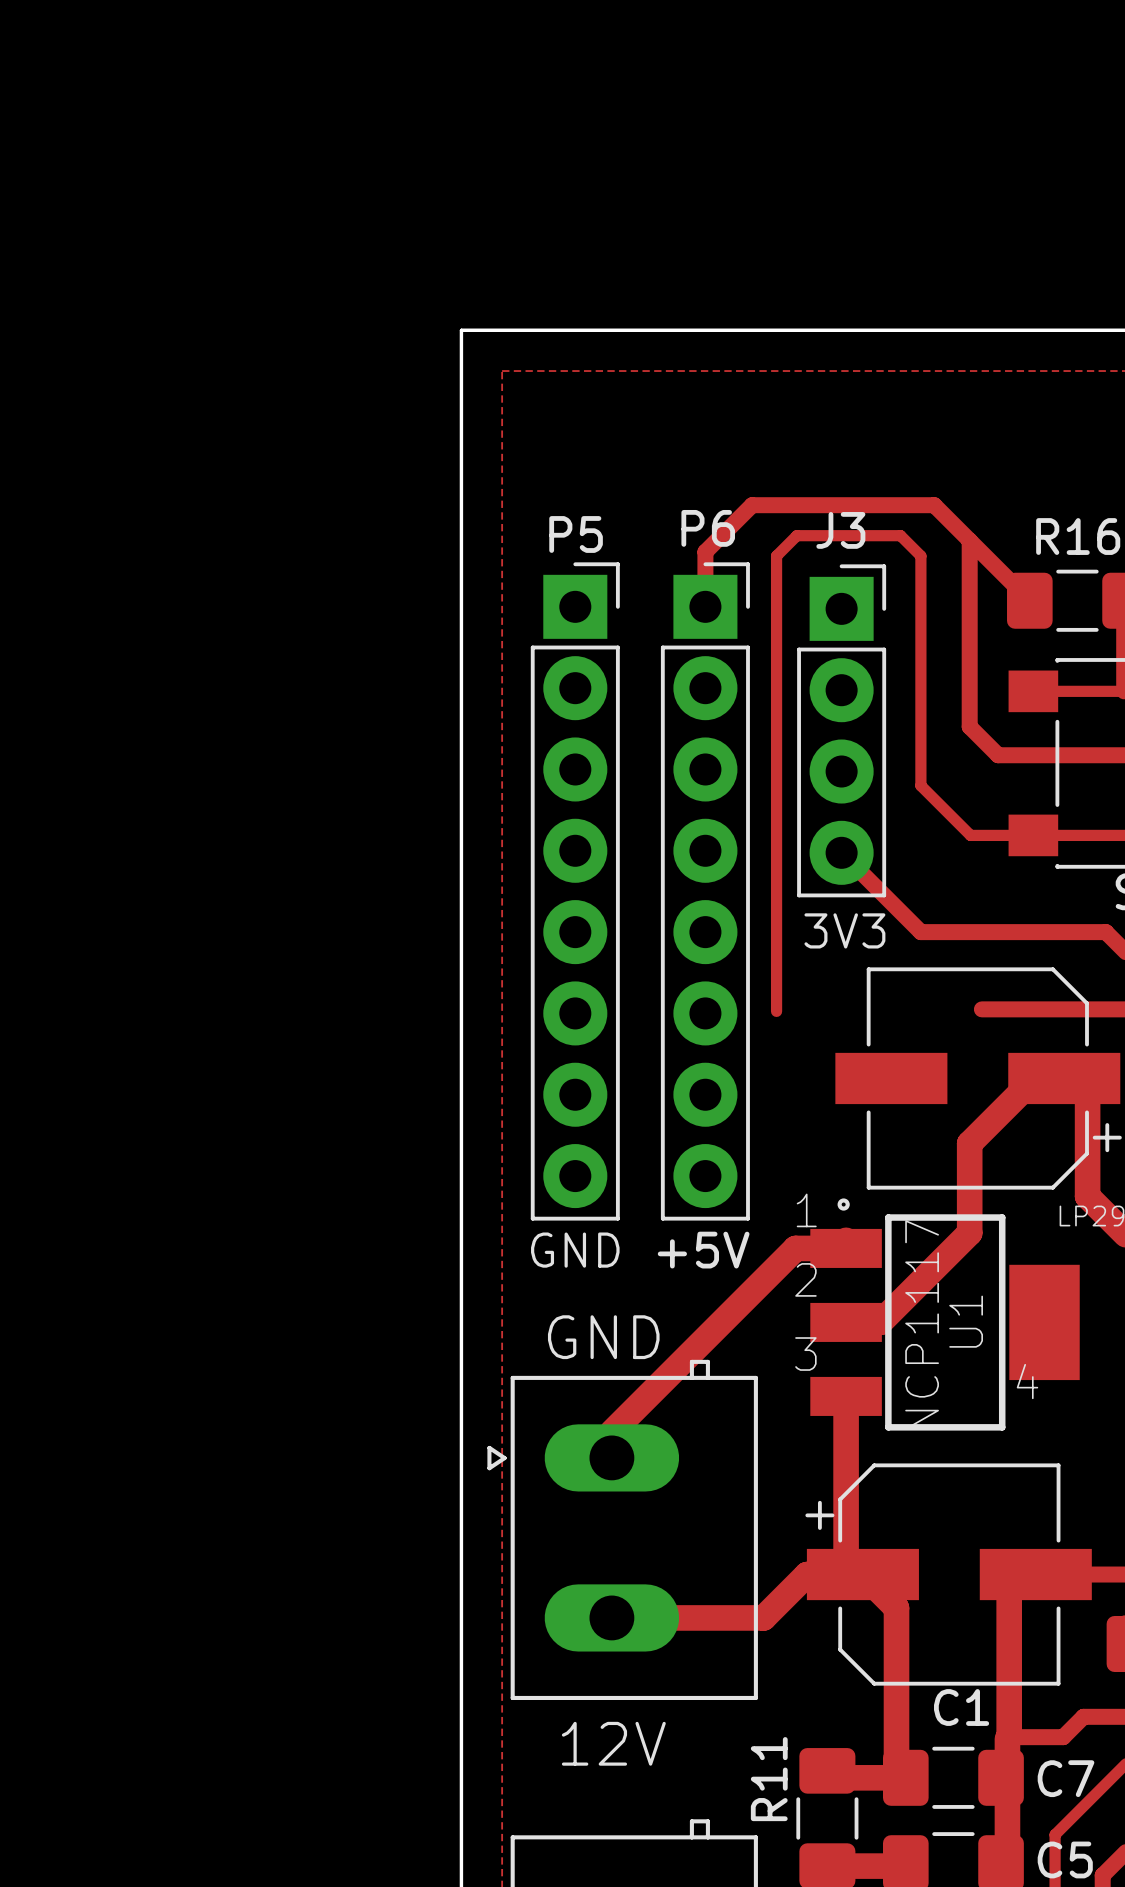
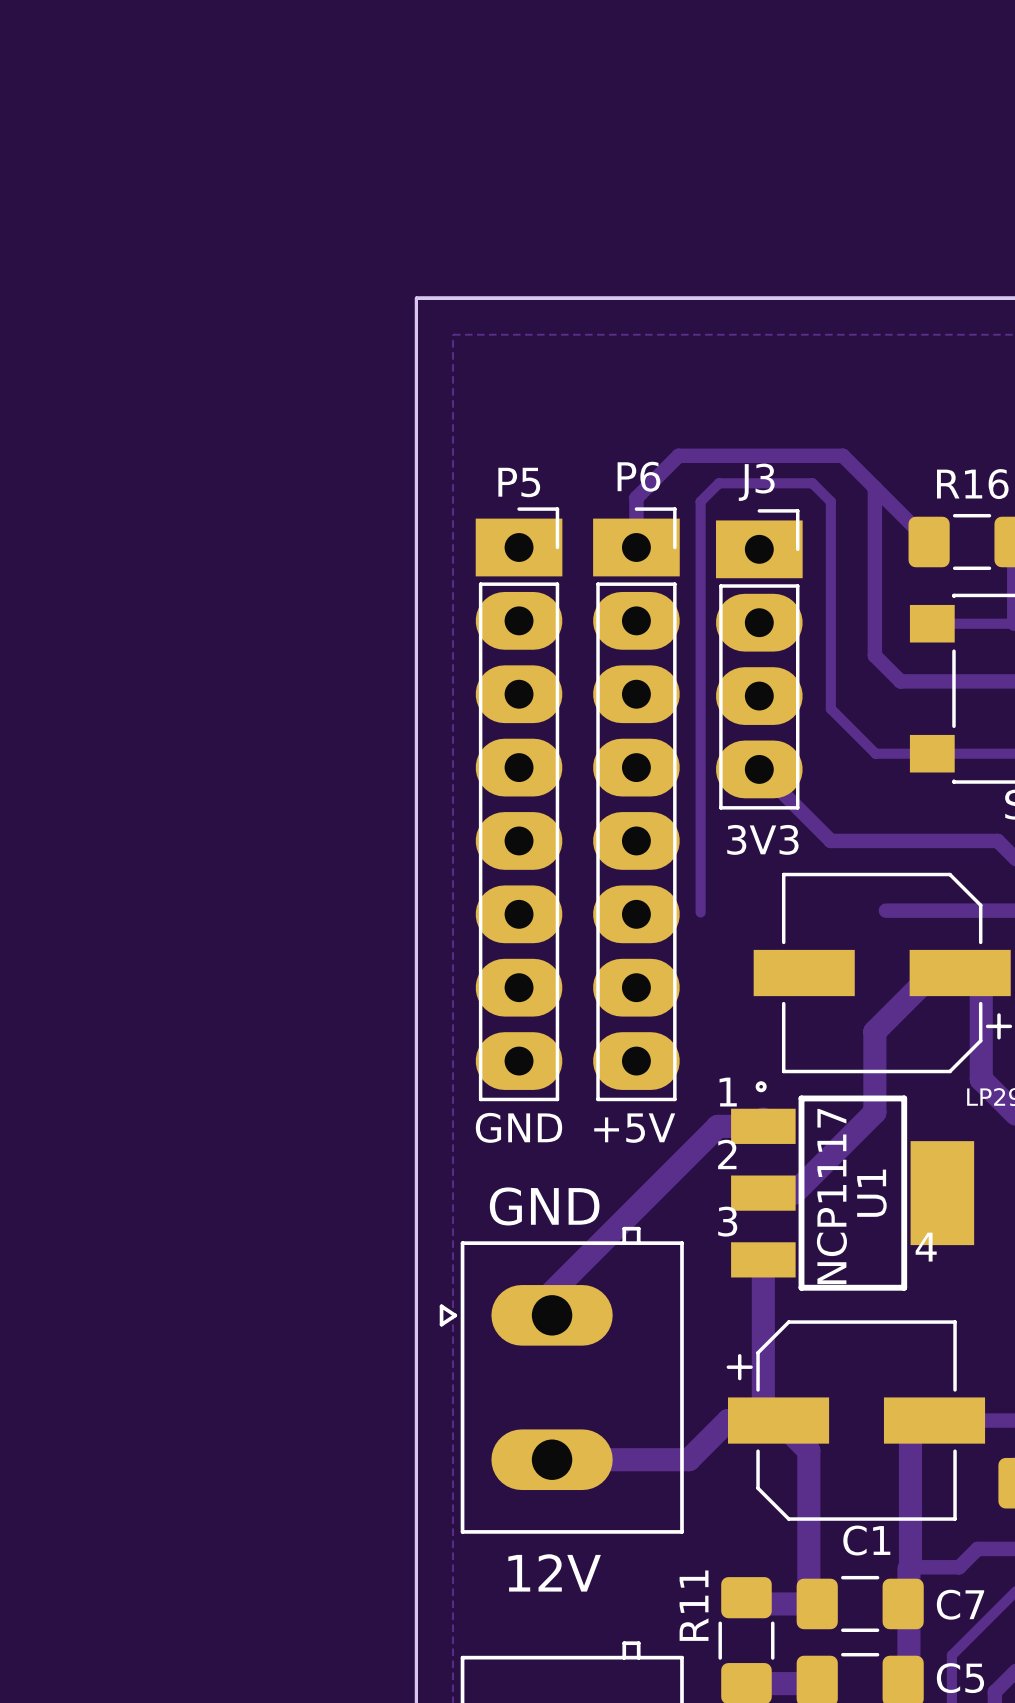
P5 footprint: [530, 562, 620, 1221] -> [475, 507, 563, 1102]
P6 footprint: [660, 562, 750, 1221] -> [593, 507, 680, 1102]
J3 footprint: [797, 564, 887, 898] -> [715, 509, 803, 810]

